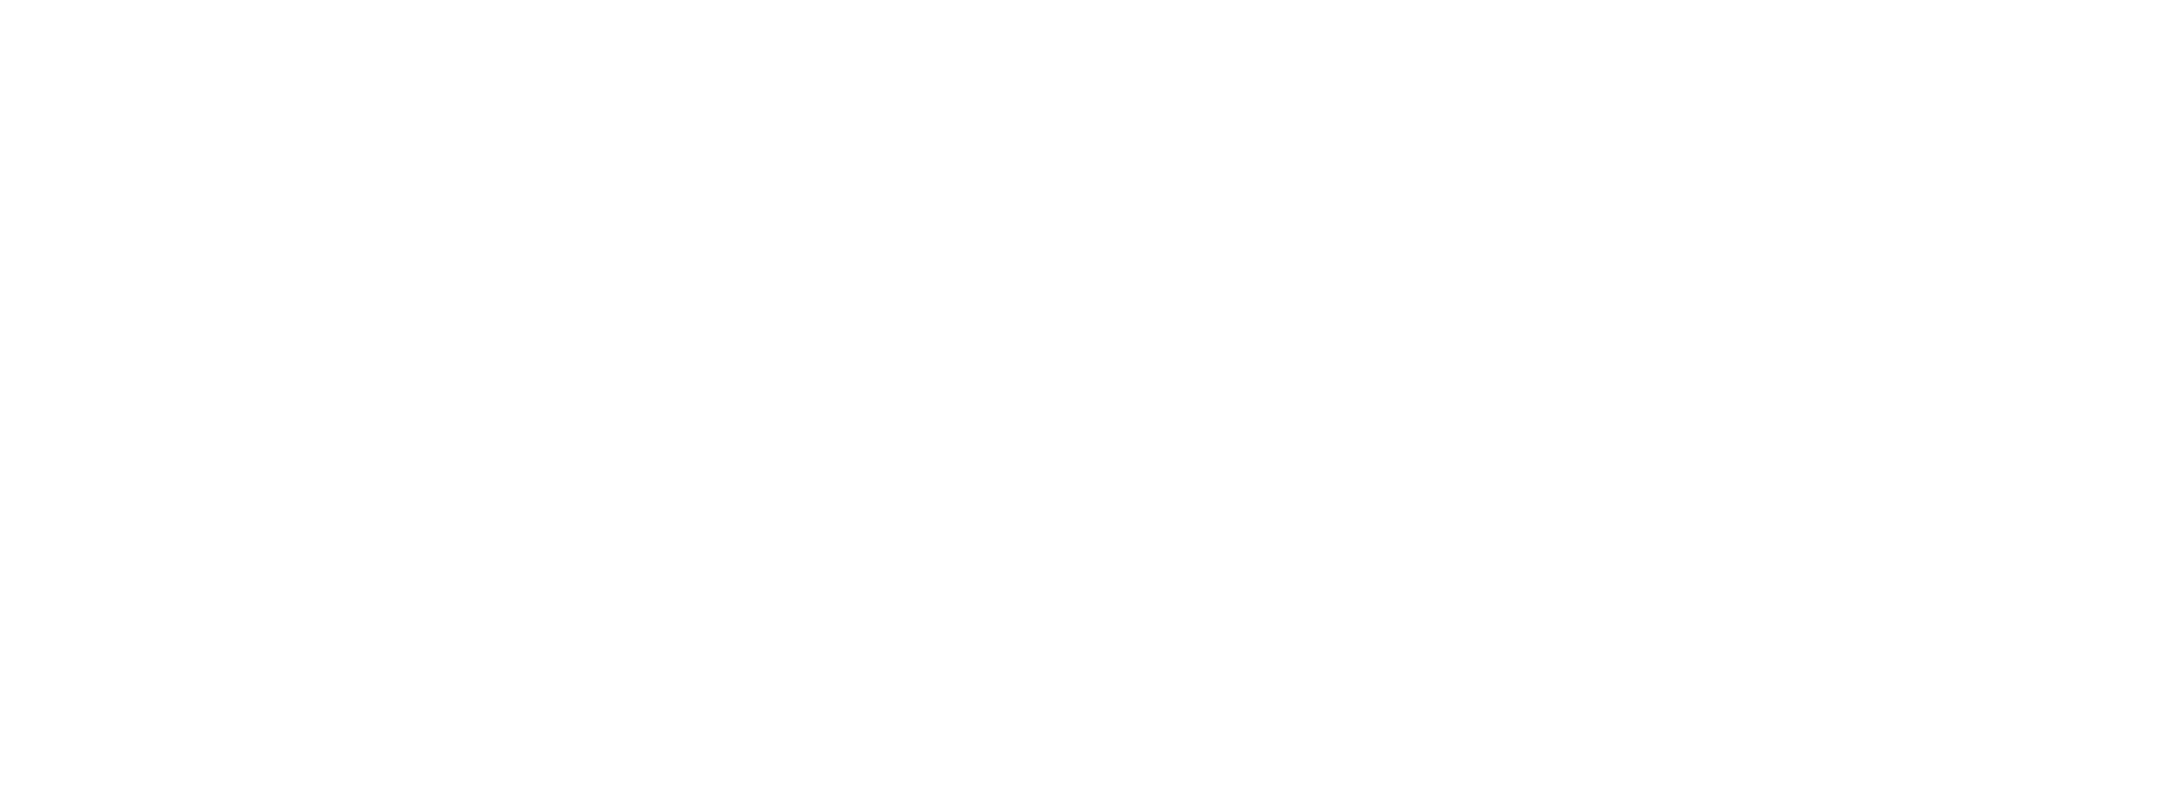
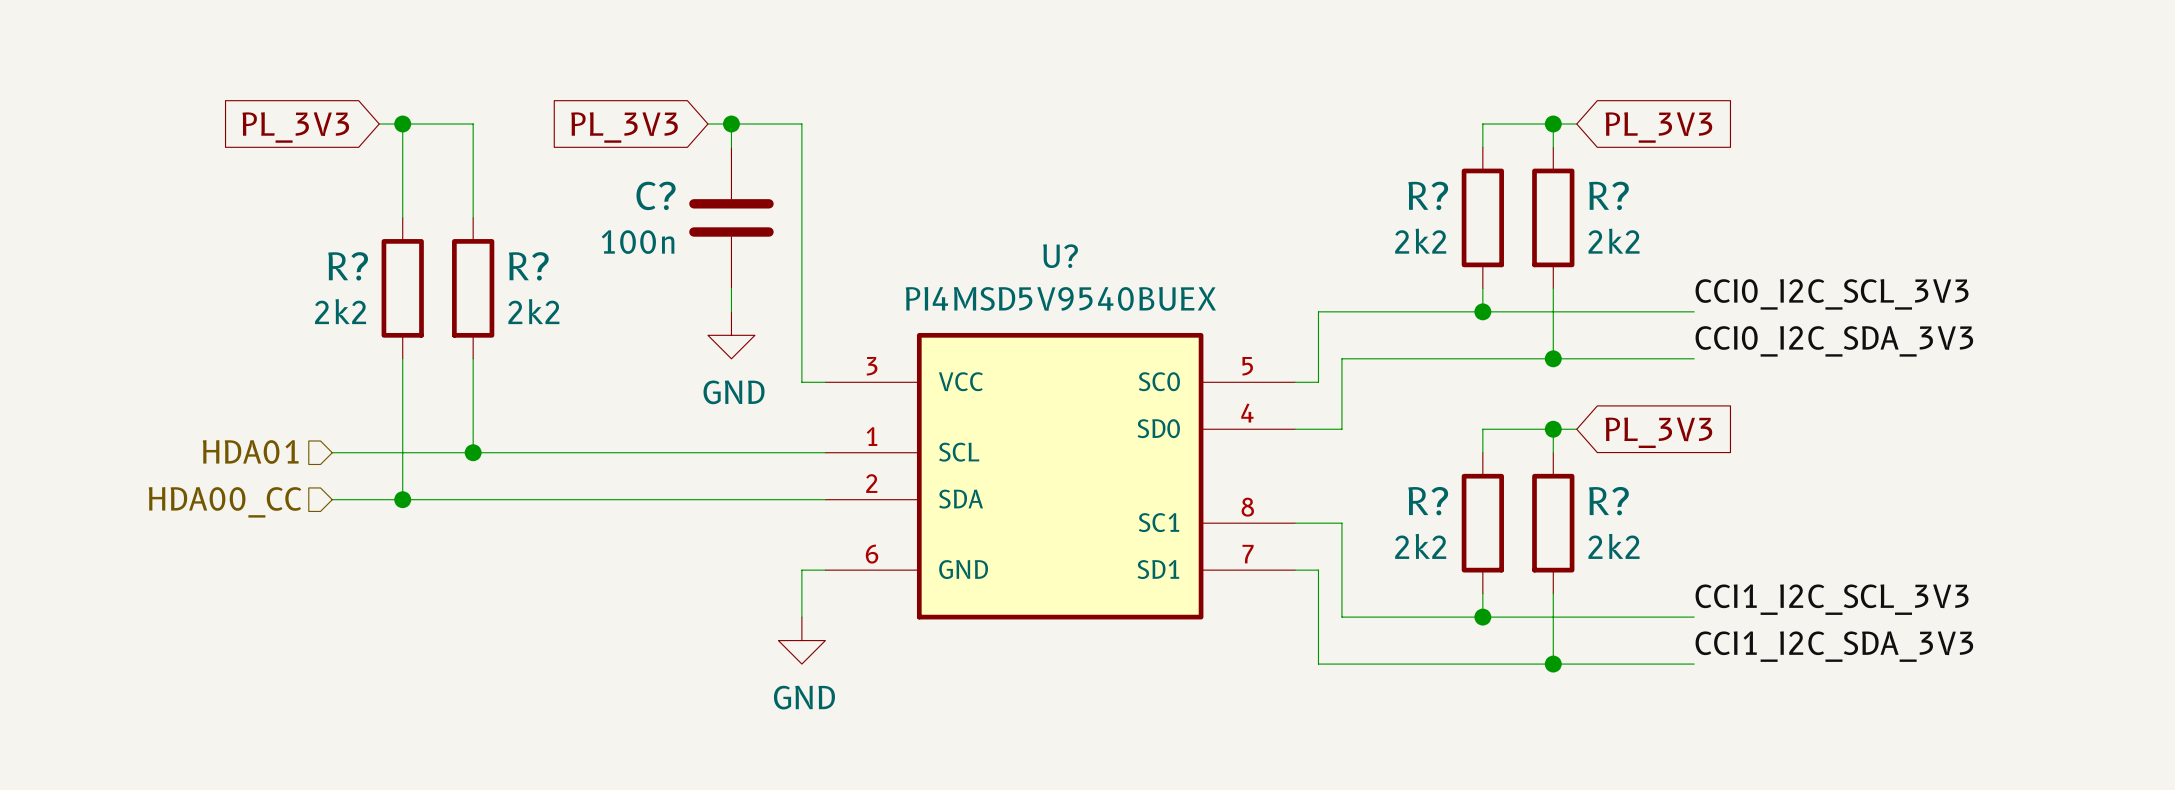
wire: none -> (379, 123) (473, 123) (473, 217)
wire: none -> (402, 123) (402, 217)
junction: none -> (402, 123)
wire: none -> (707, 123) (801, 123) (801, 382) (825, 382)
wire: none -> (731, 123) (731, 147)
junction: none -> (731, 123)
wire: none -> (1553, 123) (1553, 147)
junction: none -> (1553, 123)
wire: none -> (1576, 123) (1482, 123) (1482, 147)
global label: none -> PL_3V3 (295, 127)
global label: none -> PL_3V3 (624, 127)
global label: none -> PL_3V3 (1658, 127)
C?: none -> (731, 217)
R?: none -> (1482, 217)
R?: none -> (1553, 217)
R?: none -> (402, 288)
R?: none -> (473, 288)
wire: none -> (731, 288) (731, 311)
wire: none -> (1482, 288) (1482, 311)
wire: none -> (1553, 288) (1553, 358)
label: none -> CCI0_I2C_SCL_3V3 (1832, 294)
junction: none -> (1482, 311)
wire: none -> (1694, 311) (1318, 311) (1318, 382) (1294, 382)
power symbol: none -> GND (731, 335)
label: none -> CCI0_I2C_SDA_3V3 (1834, 341)
wire: none -> (402, 358) (402, 499)
wire: none -> (473, 358) (473, 452)
junction: none -> (1553, 358)
wire: none -> (1694, 358) (1341, 358) (1341, 429) (1294, 429)
wire: none -> (1553, 429) (1553, 452)
junction: none -> (1553, 429)
wire: none -> (1576, 429) (1482, 429) (1482, 452)
global label: none -> PL_3V3 (1658, 432)
hierarchical label: none -> HDA01 (250, 451)
wire: none -> (332, 452) (825, 452)
junction: none -> (473, 452)
U?: none -> PI4MSD5V9540BUEX (1060, 476)
wire: none -> (332, 499) (825, 499)
junction: none -> (402, 499)
hierarchical label: none -> HDA00_CC (225, 502)
wire: none -> (1294, 523) (1341, 523) (1341, 617) (1694, 617)
R?: none -> (1482, 523)
R?: none -> (1553, 523)
wire: none -> (825, 570) (801, 570) (801, 617)
wire: none -> (1294, 570) (1318, 570) (1318, 664) (1694, 664)
wire: none -> (1482, 593) (1482, 617)
wire: none -> (1553, 593) (1553, 664)
label: none -> CCI1_I2C_SCL_3V3 (1832, 599)
junction: none -> (1482, 617)
power symbol: none -> GND (801, 640)
label: none -> CCI1_I2C_SDA_3V3 (1834, 646)
junction: none -> (1553, 664)

